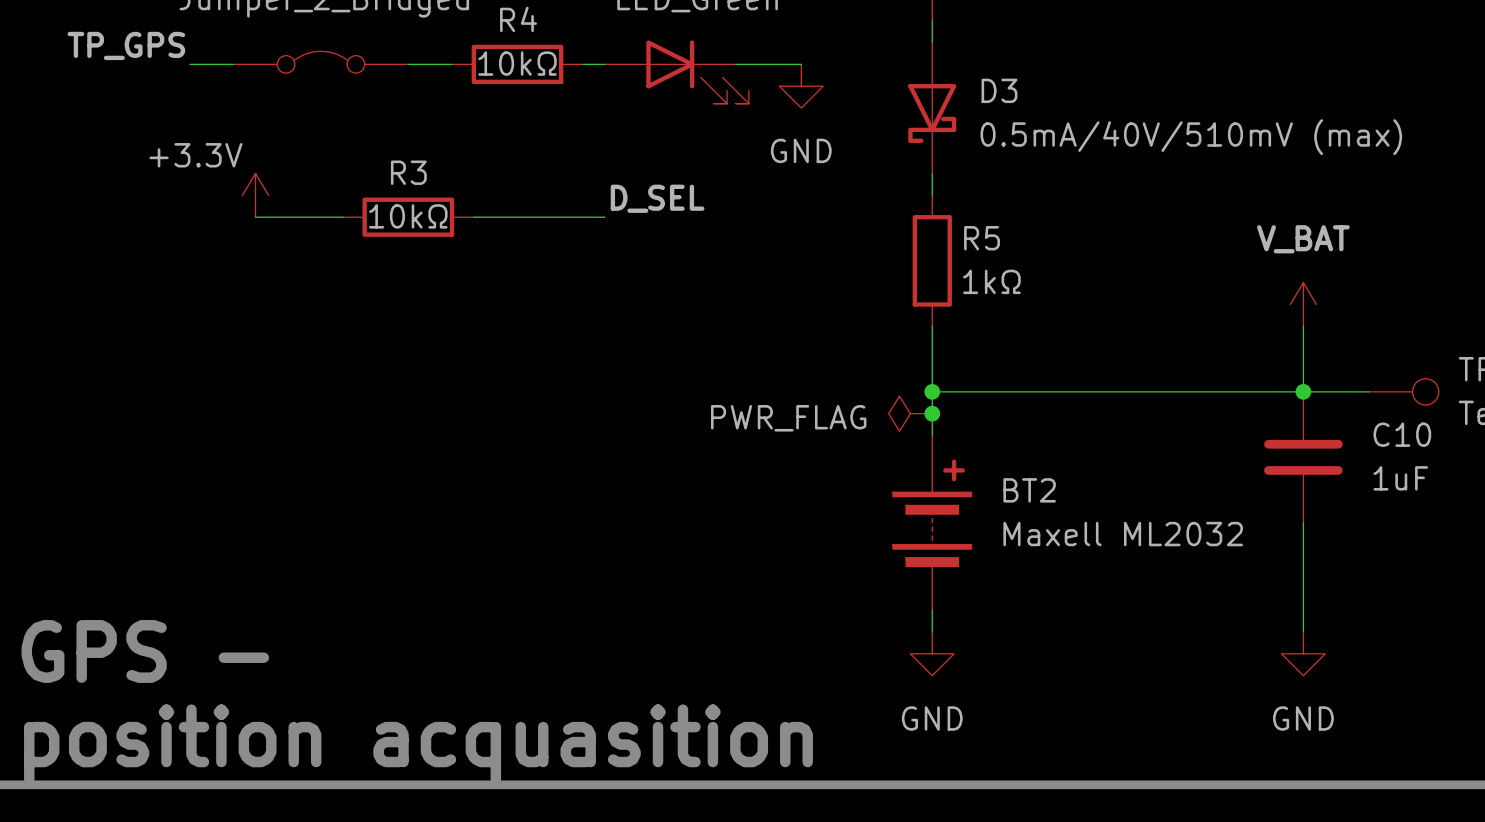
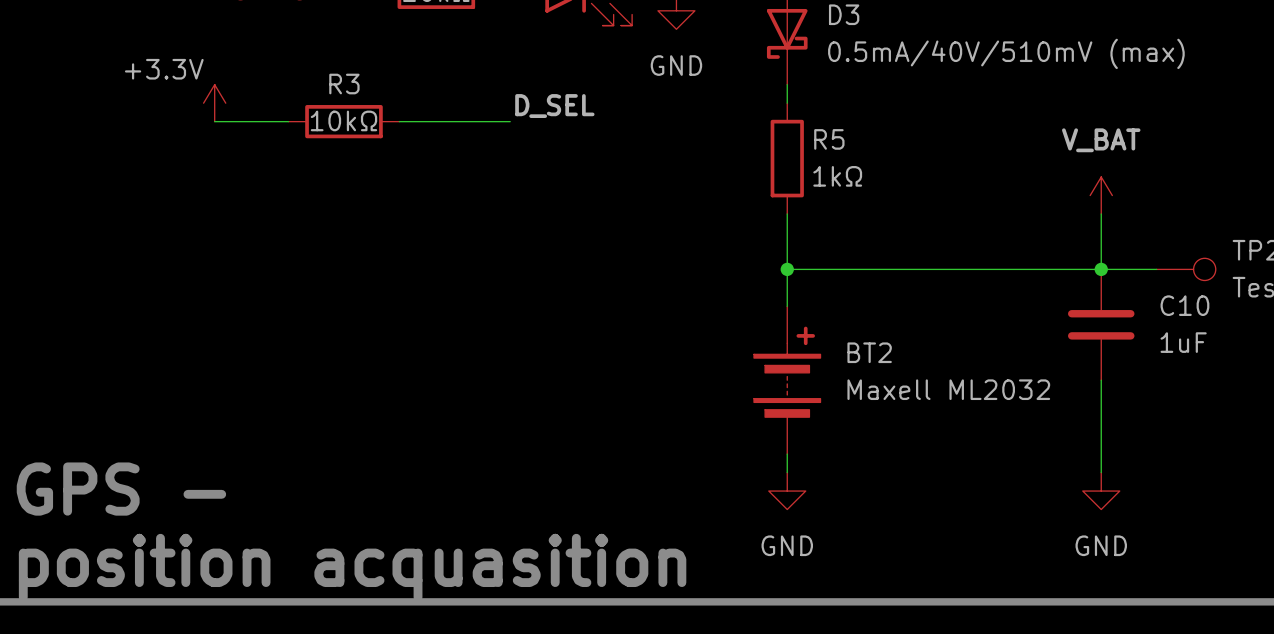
power symbol: PWR_FLAG (910, 413) -> none
junction: (932, 413) -> none

